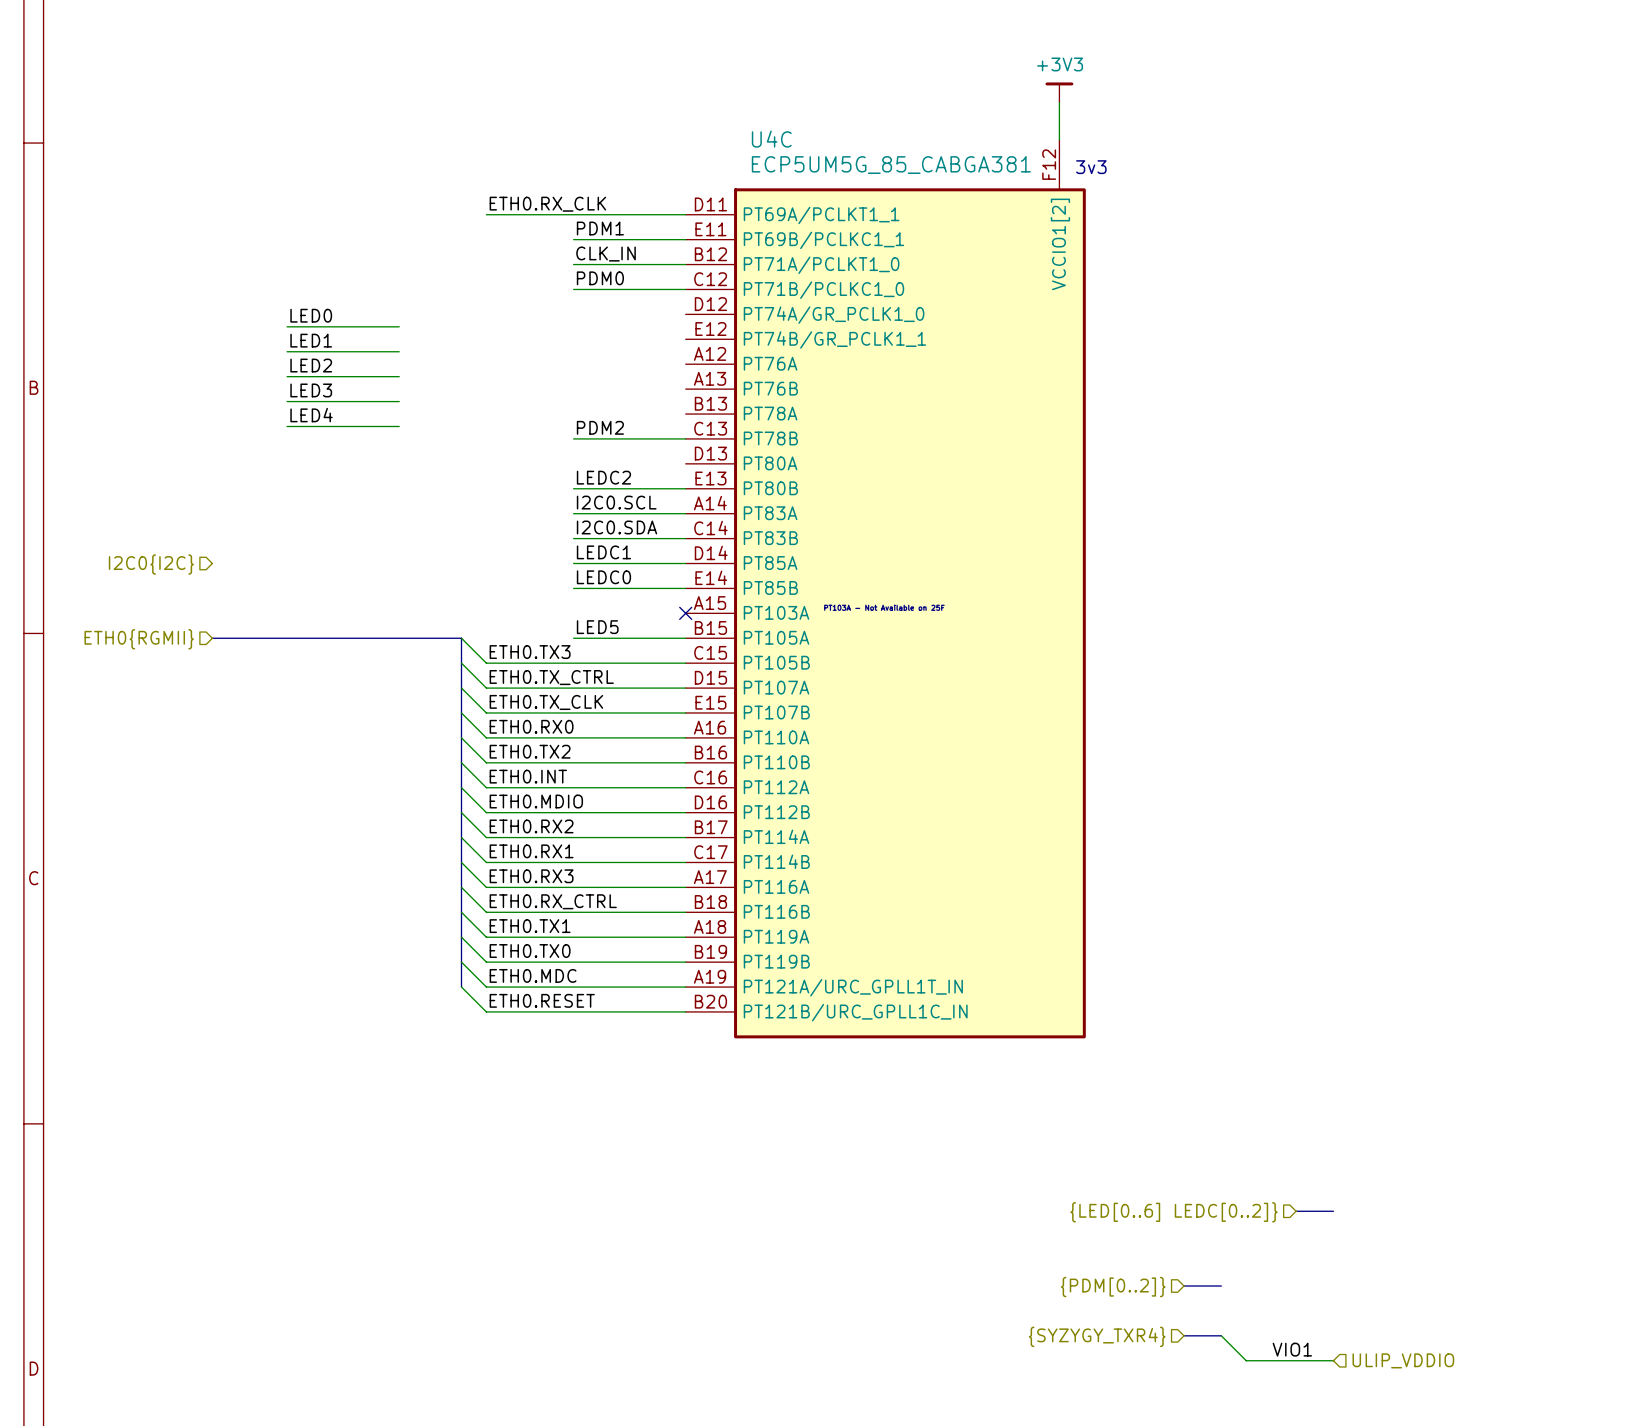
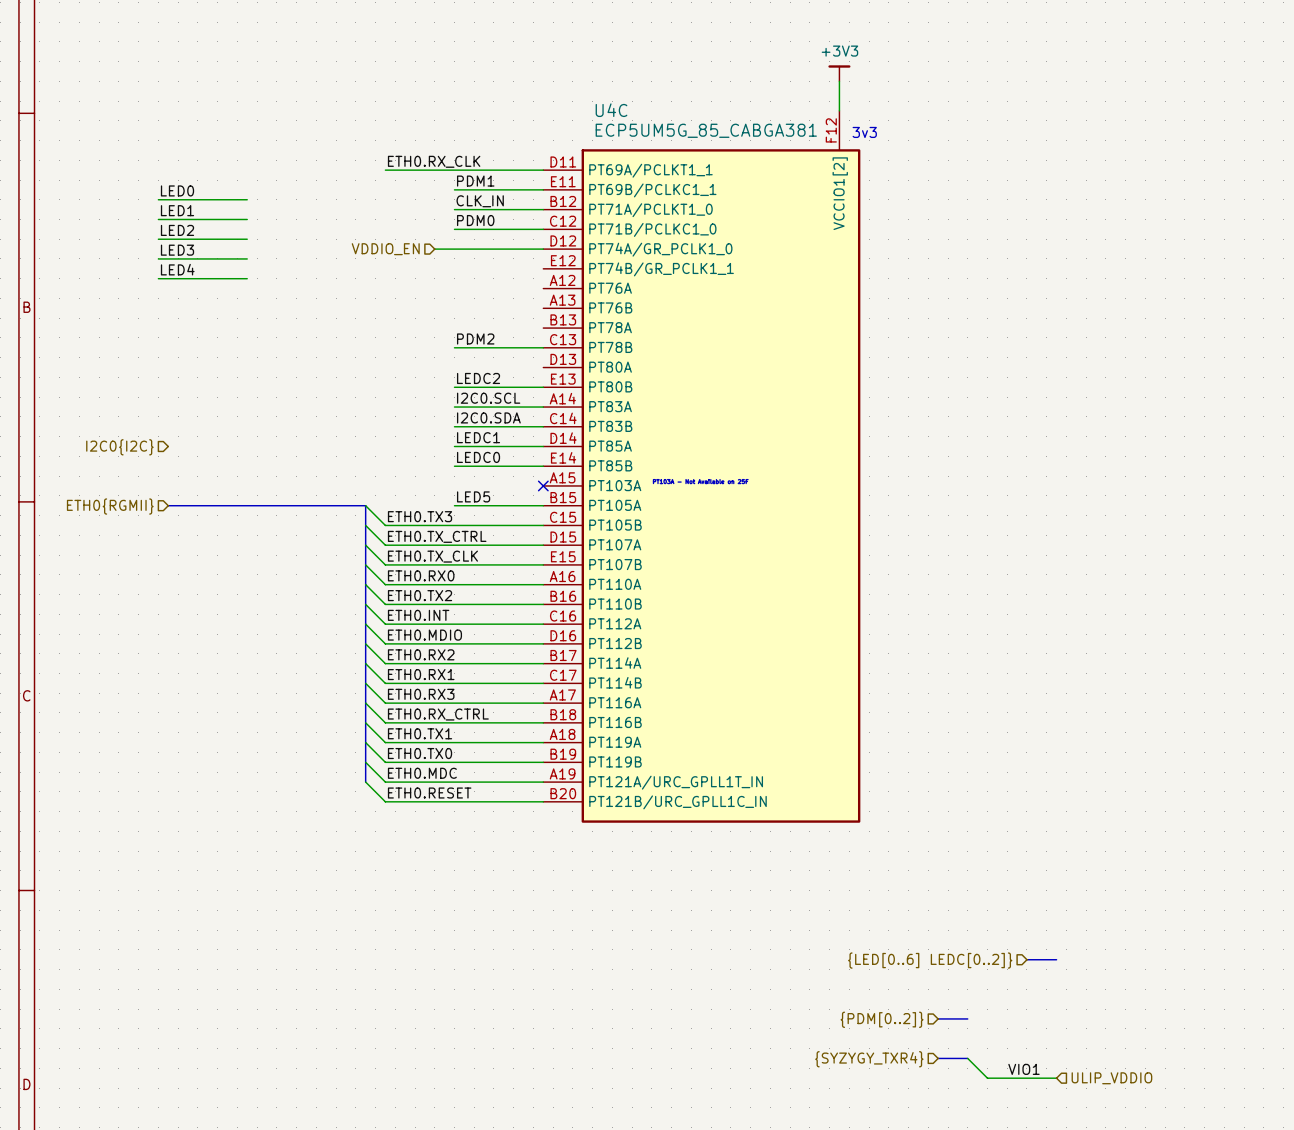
hierarchical label: none -> VDDIO_EN (385, 249)
wire: none -> (434, 249) (543, 249)
label position: LED0 (311, 315) -> LED0 (177, 190)
wire: (312, 326) (399, 326) -> (158, 258) (227, 258)
label position: LED1 (311, 340) -> LED1 (177, 210)
wire: (312, 351) (399, 351) -> (158, 278) (227, 278)
label position: LED2 (311, 365) -> LED2 (177, 230)
wire: (287, 376) (399, 376) -> (158, 239) (247, 239)
label position: LED3 (311, 390) -> LED3 (177, 250)
wire: (287, 401) (399, 401) -> (158, 219) (247, 219)
label position: LED4 (311, 415) -> LED4 (177, 269)
wire: (287, 426) (399, 426) -> (158, 199) (247, 199)

